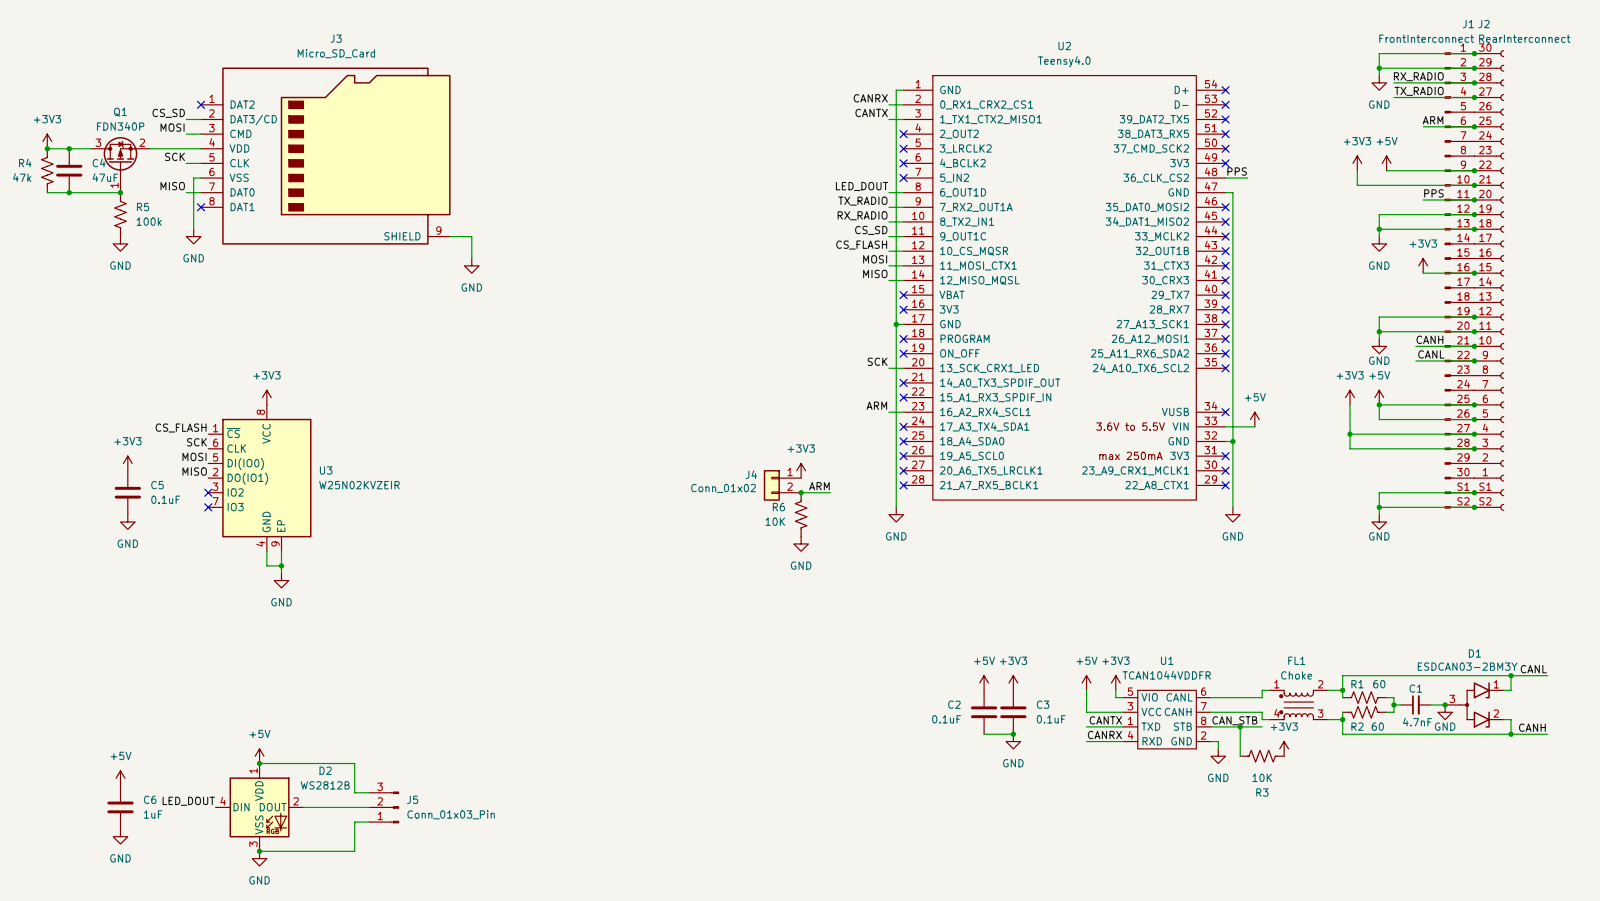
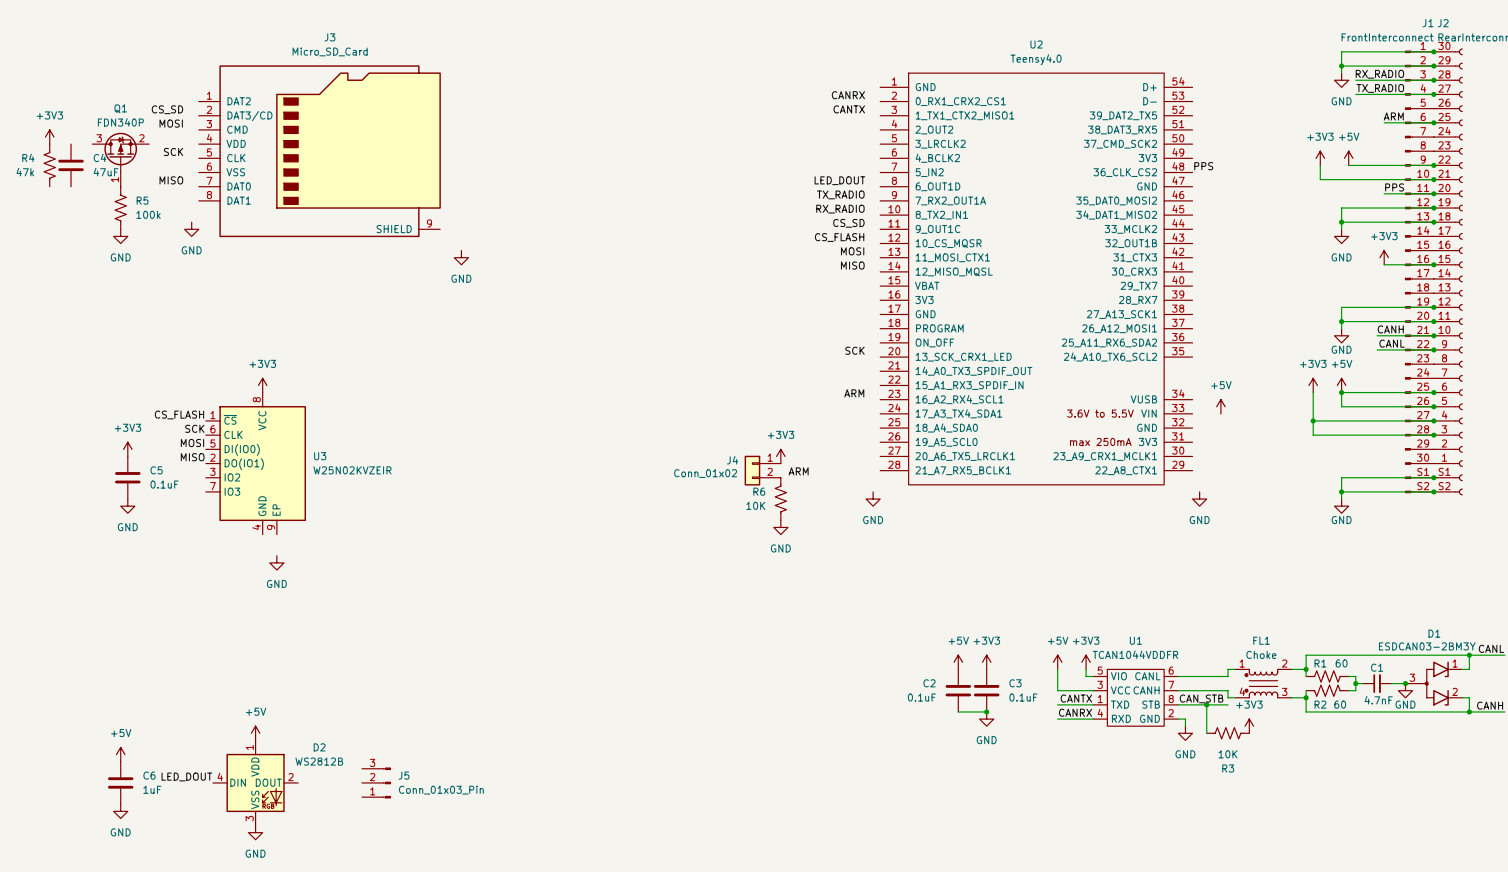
wire: (903, 90) (896, 90) (896, 507) -> none
no-connect mark: (1225, 90) -> none
no-connect mark: (200, 104) -> none
wire: (888, 104) (903, 104) -> none
no-connect mark: (1225, 104) -> none
wire: (186, 119) (200, 119) -> none
wire: (888, 119) (903, 119) -> none
no-connect mark: (1225, 119) -> none
wire: (186, 134) (200, 134) -> none
no-connect mark: (903, 134) -> none
no-connect mark: (1225, 134) -> none
wire: (47, 148) (91, 148) -> none
junction: (47, 148) -> none
junction: (69, 148) -> none
wire: (149, 148) (200, 148) -> none
no-connect mark: (903, 148) -> none
no-connect mark: (1225, 148) -> none
wire: (186, 163) (200, 163) -> none
no-connect mark: (903, 163) -> none
no-connect mark: (1225, 163) -> none
wire: (200, 178) (193, 178) (193, 229) -> none
no-connect mark: (903, 178) -> none
wire: (1225, 178) (1247, 178) -> none
wire: (47, 192) (120, 192) -> none
junction: (69, 192) -> none
junction: (120, 192) -> none
wire: (186, 192) (200, 192) -> none
wire: (888, 192) (903, 192) -> none
wire: (1225, 192) (1232, 192) (1232, 507) -> none
no-connect mark: (200, 207) -> none
wire: (888, 207) (903, 207) -> none
no-connect mark: (1225, 207) -> none
wire: (888, 221) (903, 221) -> none
no-connect mark: (1225, 221) -> none
wire: (449, 236) (471, 236) (471, 258) -> none
wire: (888, 236) (903, 236) -> none
no-connect mark: (1225, 236) -> none
wire: (888, 251) (903, 251) -> none
no-connect mark: (1225, 251) -> none
wire: (888, 265) (903, 265) -> none
no-connect mark: (1225, 265) -> none
wire: (888, 280) (903, 280) -> none
no-connect mark: (1225, 280) -> none
no-connect mark: (903, 295) -> none
no-connect mark: (1225, 295) -> none
no-connect mark: (903, 309) -> none
no-connect mark: (1225, 309) -> none
wire: (896, 324) (903, 324) -> none
junction: (896, 324) -> none
no-connect mark: (1225, 324) -> none
no-connect mark: (903, 339) -> none
no-connect mark: (1225, 339) -> none
no-connect mark: (903, 353) -> none
no-connect mark: (1225, 353) -> none
wire: (888, 368) (903, 368) -> none
no-connect mark: (1225, 368) -> none
no-connect mark: (903, 382) -> none
no-connect mark: (903, 397) -> none
wire: (888, 412) (903, 412) -> none
no-connect mark: (1225, 412) -> none
no-connect mark: (903, 426) -> none
wire: (1225, 426) (1254, 426) -> none
no-connect mark: (903, 441) -> none
wire: (1225, 441) (1232, 441) -> none
junction: (1232, 441) -> none
no-connect mark: (903, 456) -> none
no-connect mark: (1225, 456) -> none
no-connect mark: (903, 470) -> none
no-connect mark: (1225, 470) -> none
no-connect mark: (903, 485) -> none
no-connect mark: (1225, 485) -> none
no-connect mark: (208, 492) -> none
wire: (801, 492) (830, 492) -> none
junction: (801, 492) -> none
no-connect mark: (208, 507) -> none
wire: (266, 551) (266, 565) (281, 565) -> none
wire: (281, 551) (281, 573) -> none
junction: (281, 565) -> none
wire: (259, 763) (354, 763) (354, 792) (369, 792) -> none
junction: (259, 763) -> none
wire: (303, 807) (369, 807) -> none
wire: (369, 822) (354, 822) (354, 851) (259, 851) -> none
junction: (259, 851) -> none

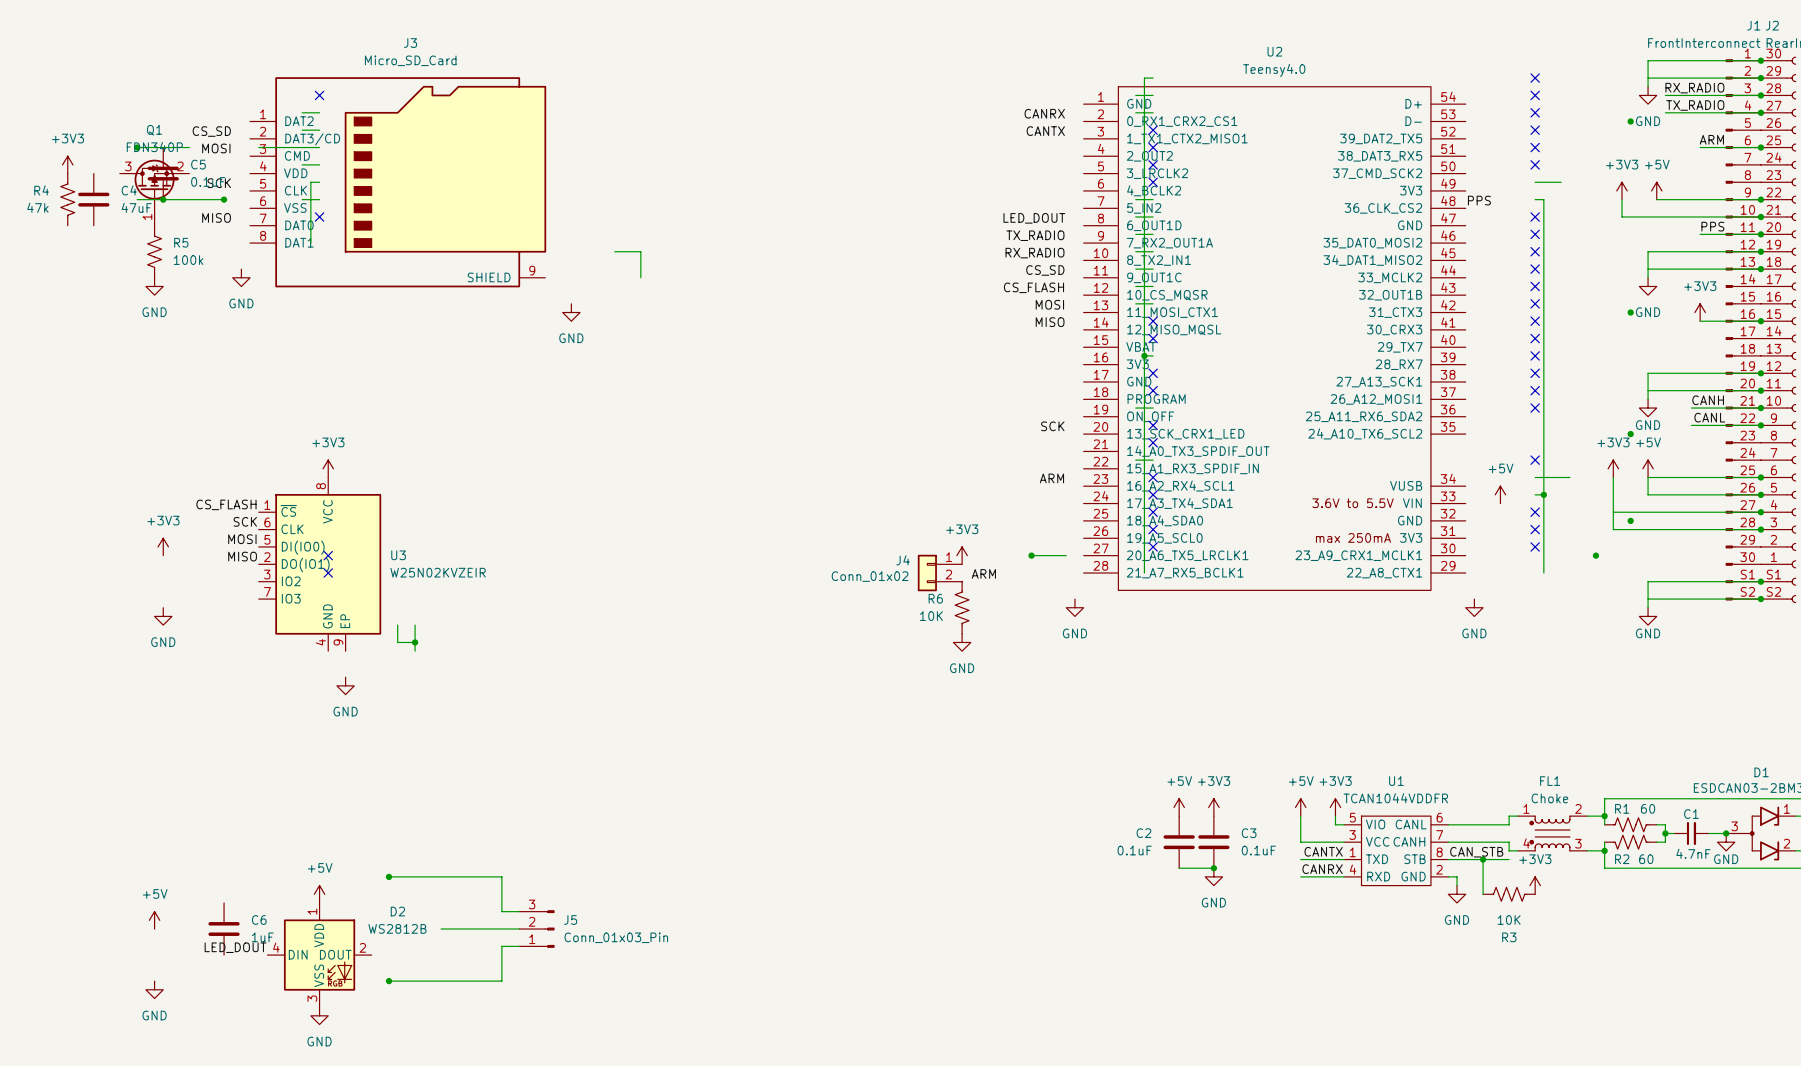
wire: none -> (1153, 78) (1144, 78) (1144, 573)
no-connect mark: none -> (1535, 78)
junction: (1341, 66) -> none
no-connect mark: none -> (319, 95)
wire: none -> (1135, 95) (1153, 95)
no-connect mark: none -> (1535, 95)
wire: none -> (302, 112) (319, 112)
wire: none -> (1135, 112) (1153, 112)
no-connect mark: none -> (1535, 112)
junction: none -> (1630, 121)
wire: none -> (302, 130) (319, 130)
no-connect mark: none -> (1153, 130)
no-connect mark: none -> (1535, 130)
wire: none -> (137, 147) (189, 147)
junction: none -> (137, 147)
wire: none -> (258, 147) (319, 147)
no-connect mark: none -> (1153, 147)
no-connect mark: none -> (1535, 147)
wire: none -> (302, 164) (319, 164)
no-connect mark: none -> (1153, 164)
no-connect mark: none -> (1535, 164)
wire: none -> (319, 182) (310, 182) (310, 243)
no-connect mark: none -> (1153, 182)
wire: none -> (1535, 182) (1561, 182)
wire: none -> (137, 199) (224, 199)
junction: none -> (163, 199)
junction: none -> (224, 199)
wire: none -> (302, 199) (319, 199)
wire: none -> (1135, 199) (1153, 199)
wire: none -> (1535, 199) (1543, 199) (1543, 573)
no-connect mark: none -> (319, 217)
wire: none -> (1135, 217) (1153, 217)
no-connect mark: none -> (1535, 217)
wire: none -> (1135, 234) (1153, 234)
no-connect mark: none -> (1535, 234)
wire: none -> (614, 251) (640, 251) (640, 277)
wire: none -> (1135, 251) (1153, 251)
no-connect mark: none -> (1535, 251)
wire: none -> (1135, 269) (1153, 269)
no-connect mark: none -> (1535, 269)
junction: (1341, 222) -> none
wire: none -> (1135, 286) (1153, 286)
no-connect mark: none -> (1535, 286)
wire: none -> (1135, 303) (1153, 303)
no-connect mark: none -> (1535, 303)
junction: none -> (1630, 312)
no-connect mark: none -> (1153, 321)
no-connect mark: none -> (1535, 321)
no-connect mark: none -> (1153, 338)
no-connect mark: none -> (1535, 338)
wire: none -> (1144, 355) (1153, 355)
junction: none -> (1144, 355)
no-connect mark: none -> (1535, 355)
no-connect mark: none -> (1153, 373)
no-connect mark: none -> (1535, 373)
no-connect mark: none -> (1153, 390)
no-connect mark: none -> (1535, 390)
junction: (1341, 321) -> none
wire: none -> (1135, 408) (1153, 408)
no-connect mark: none -> (1535, 408)
no-connect mark: none -> (1153, 425)
junction: none -> (1630, 434)
no-connect mark: none -> (1153, 442)
wire: none -> (1135, 460) (1153, 460)
no-connect mark: none -> (1535, 460)
no-connect mark: none -> (1153, 477)
wire: none -> (1535, 477) (1569, 477)
junction: (1341, 392) -> none
no-connect mark: none -> (1153, 494)
wire: none -> (1535, 494) (1543, 494)
junction: none -> (1543, 494)
no-connect mark: none -> (1153, 512)
no-connect mark: none -> (1535, 512)
junction position: (1313, 420) -> (1630, 520)
no-connect mark: none -> (1153, 529)
no-connect mark: none -> (1535, 529)
no-connect mark: none -> (1153, 546)
no-connect mark: none -> (1535, 546)
no-connect mark: none -> (328, 555)
wire: none -> (1031, 555) (1066, 555)
junction: none -> (1031, 555)
junction: none -> (1595, 555)
no-connect mark: none -> (328, 573)
C5 position: (127, 477) -> (163, 173)
junction: (1341, 491) -> none
wire: none -> (397, 625) (397, 642) (415, 642)
wire: none -> (415, 625) (415, 651)
junction: none -> (415, 642)
wire: none -> (389, 876) (501, 876) (501, 911) (519, 911)
junction: none -> (389, 876)
wire: none -> (441, 929) (519, 929)
wire: none -> (519, 946) (501, 946) (501, 981) (389, 981)
C6 position: (120, 782) -> (224, 929)
J5 position: (376, 782) -> (536, 929)
junction: none -> (389, 981)

